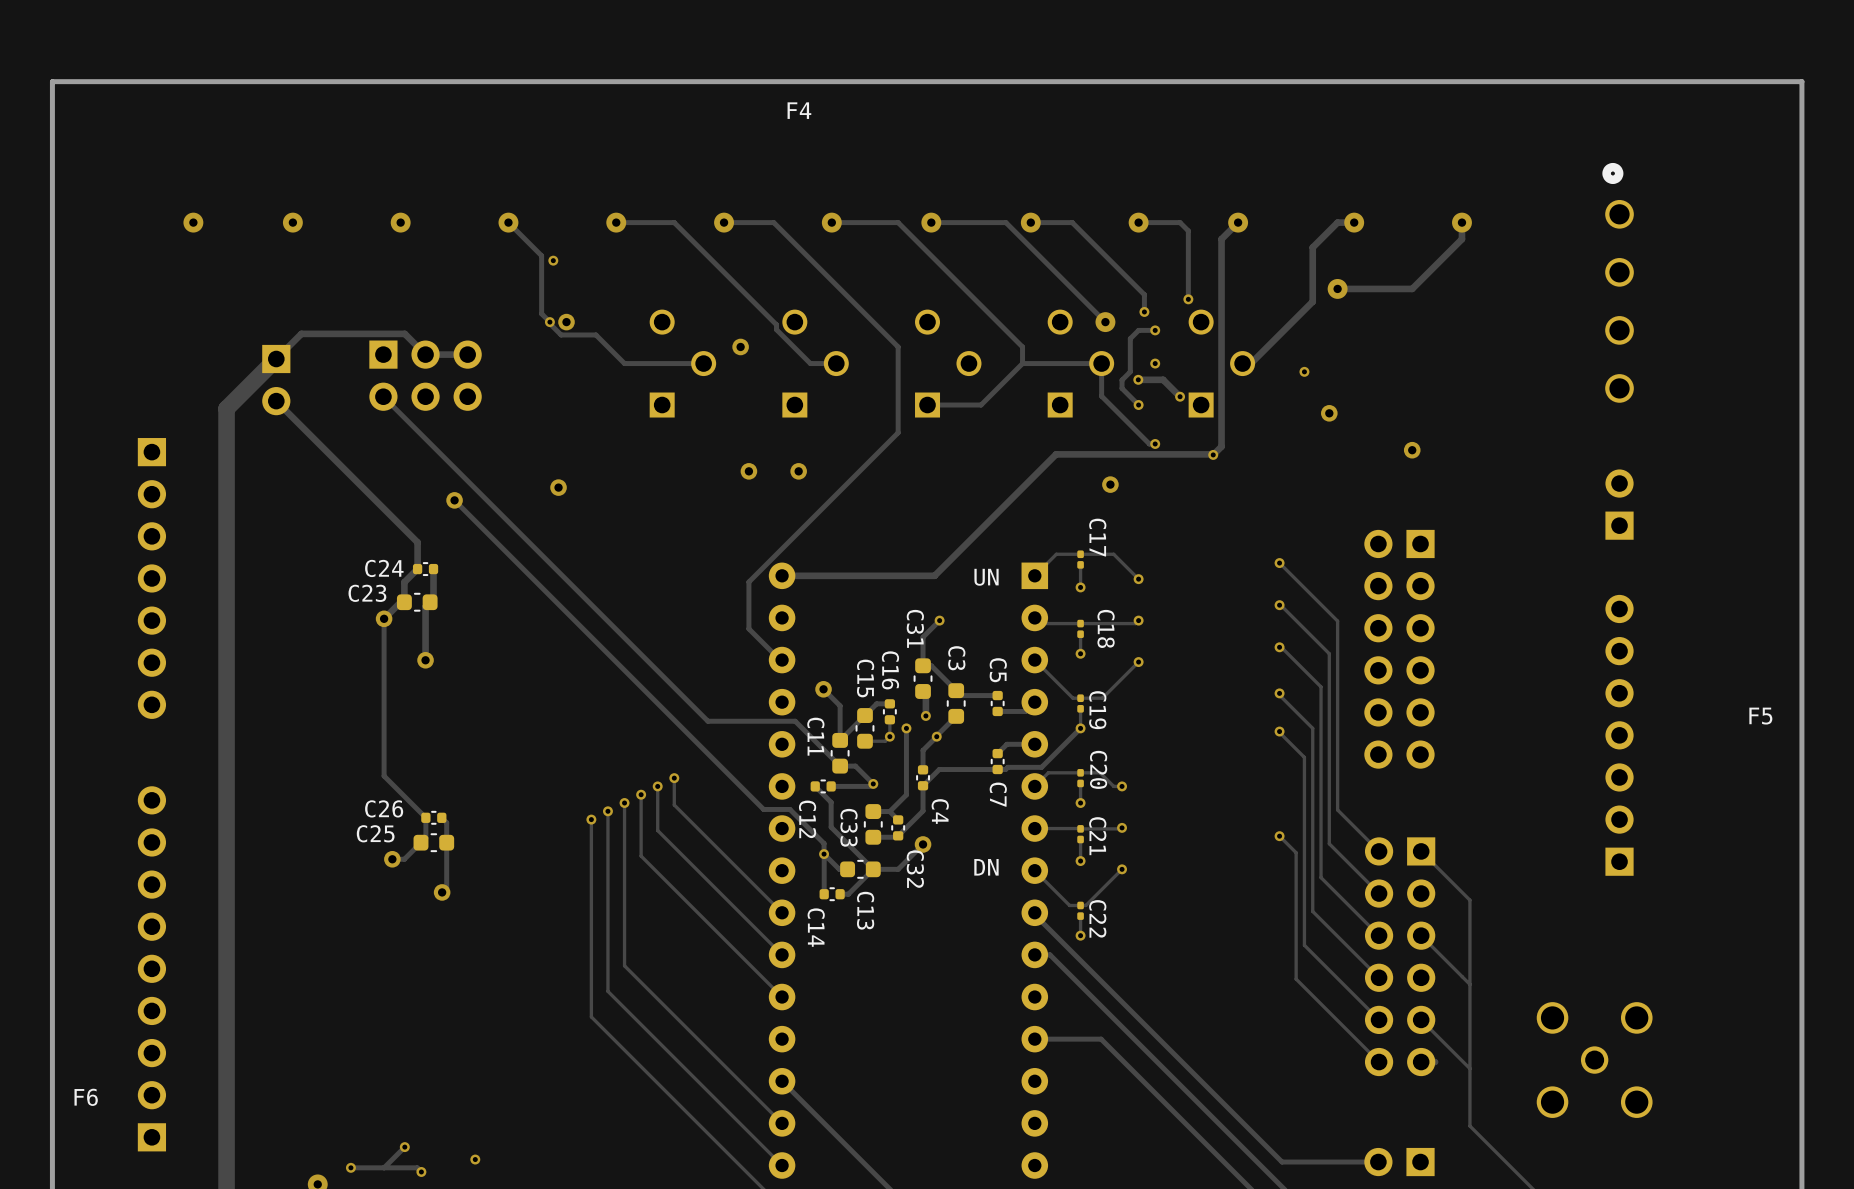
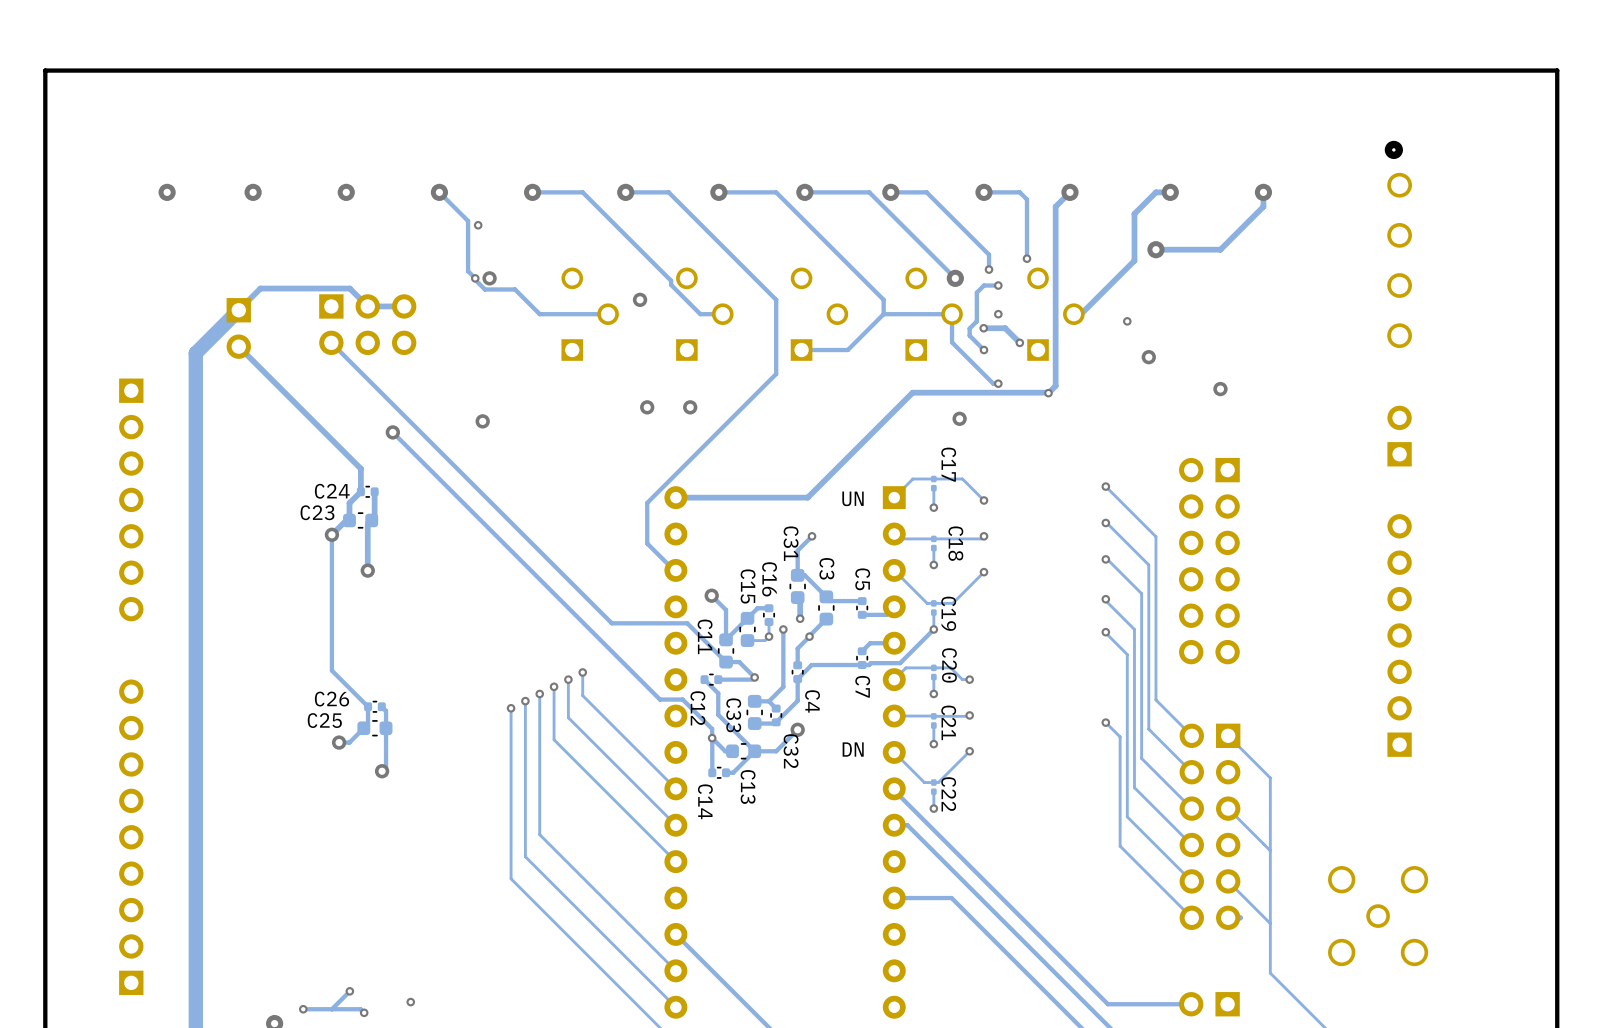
F4: (799, 110) -> none
F5: (1760, 716) -> none
F6: (86, 1097) -> none

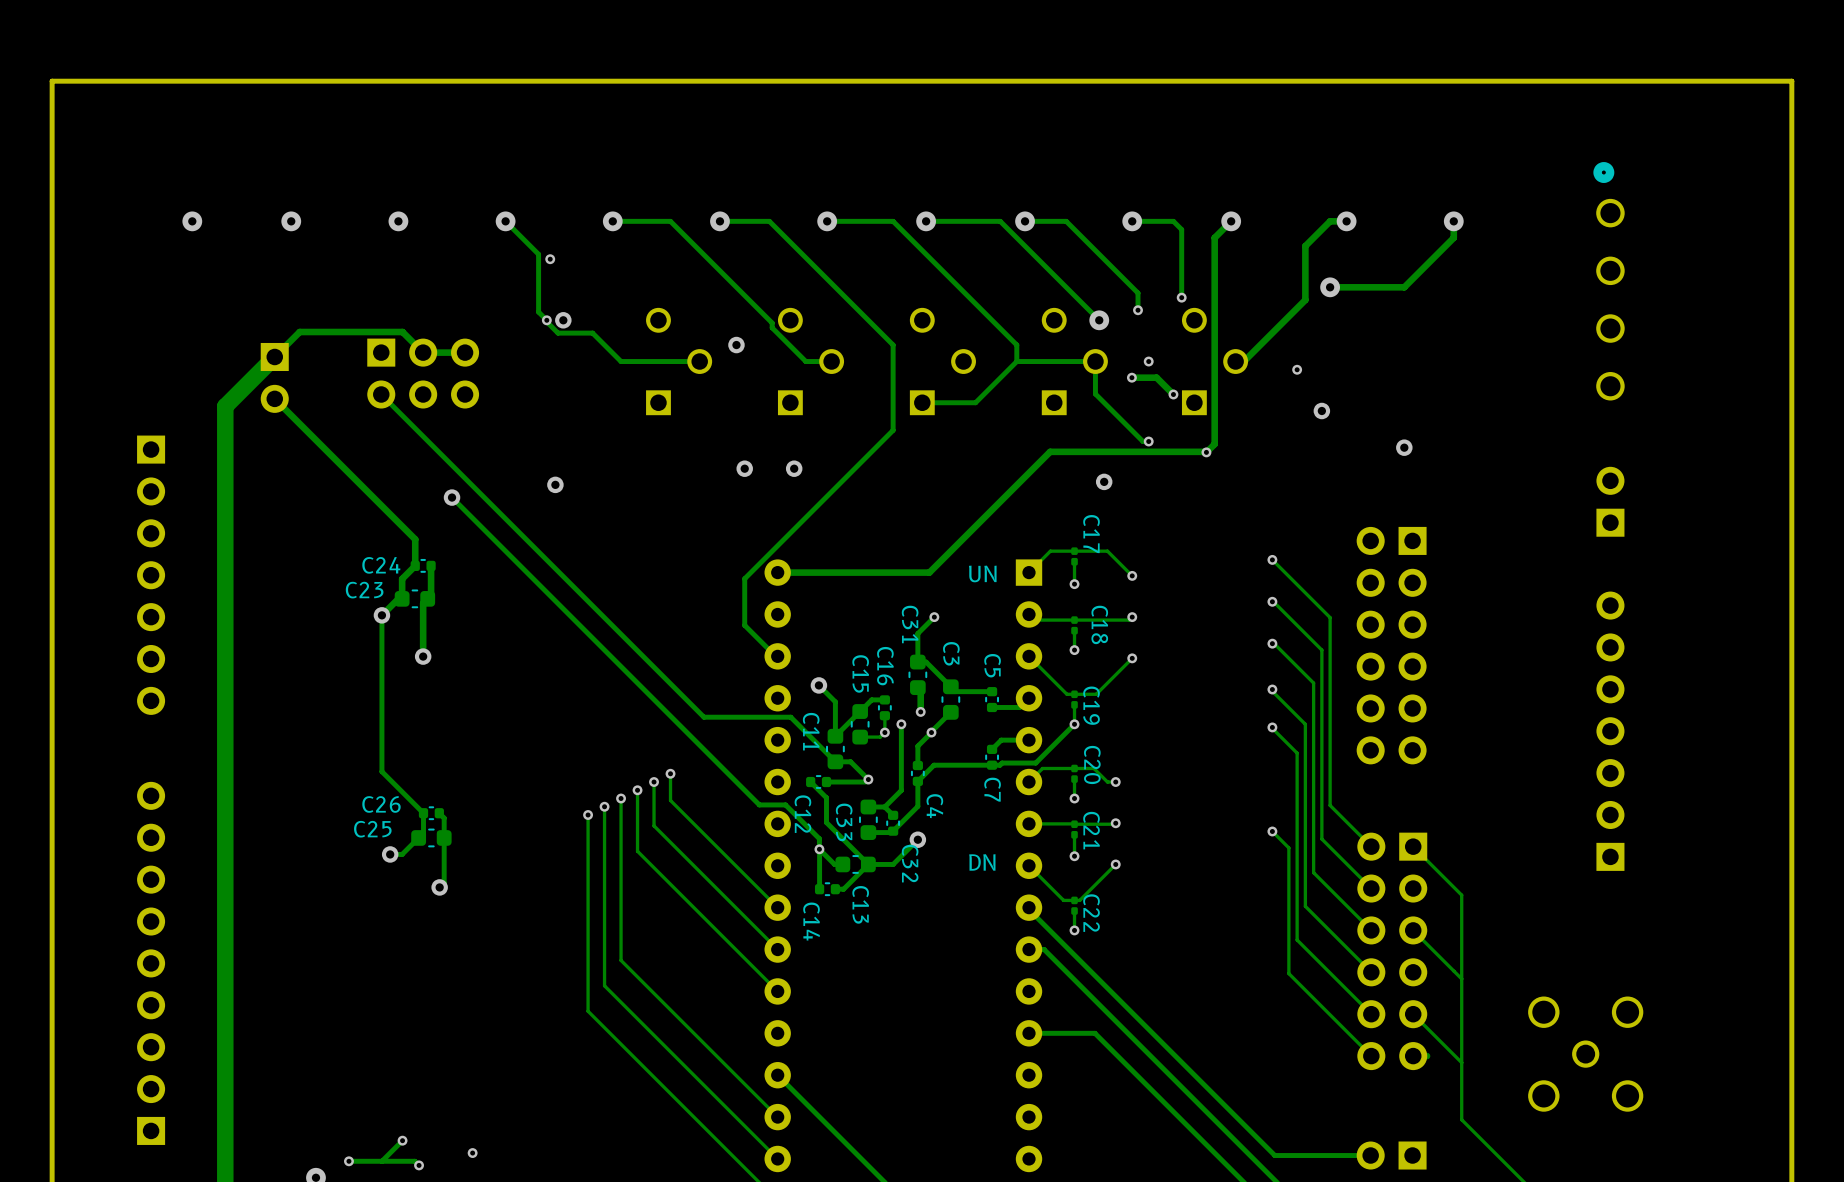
track: (998, 285) (983, 285) (976, 292) (976, 321) (969, 328) (969, 335) (983, 350) -> none
via: (998, 285) -> none
via: (983, 350) -> none

